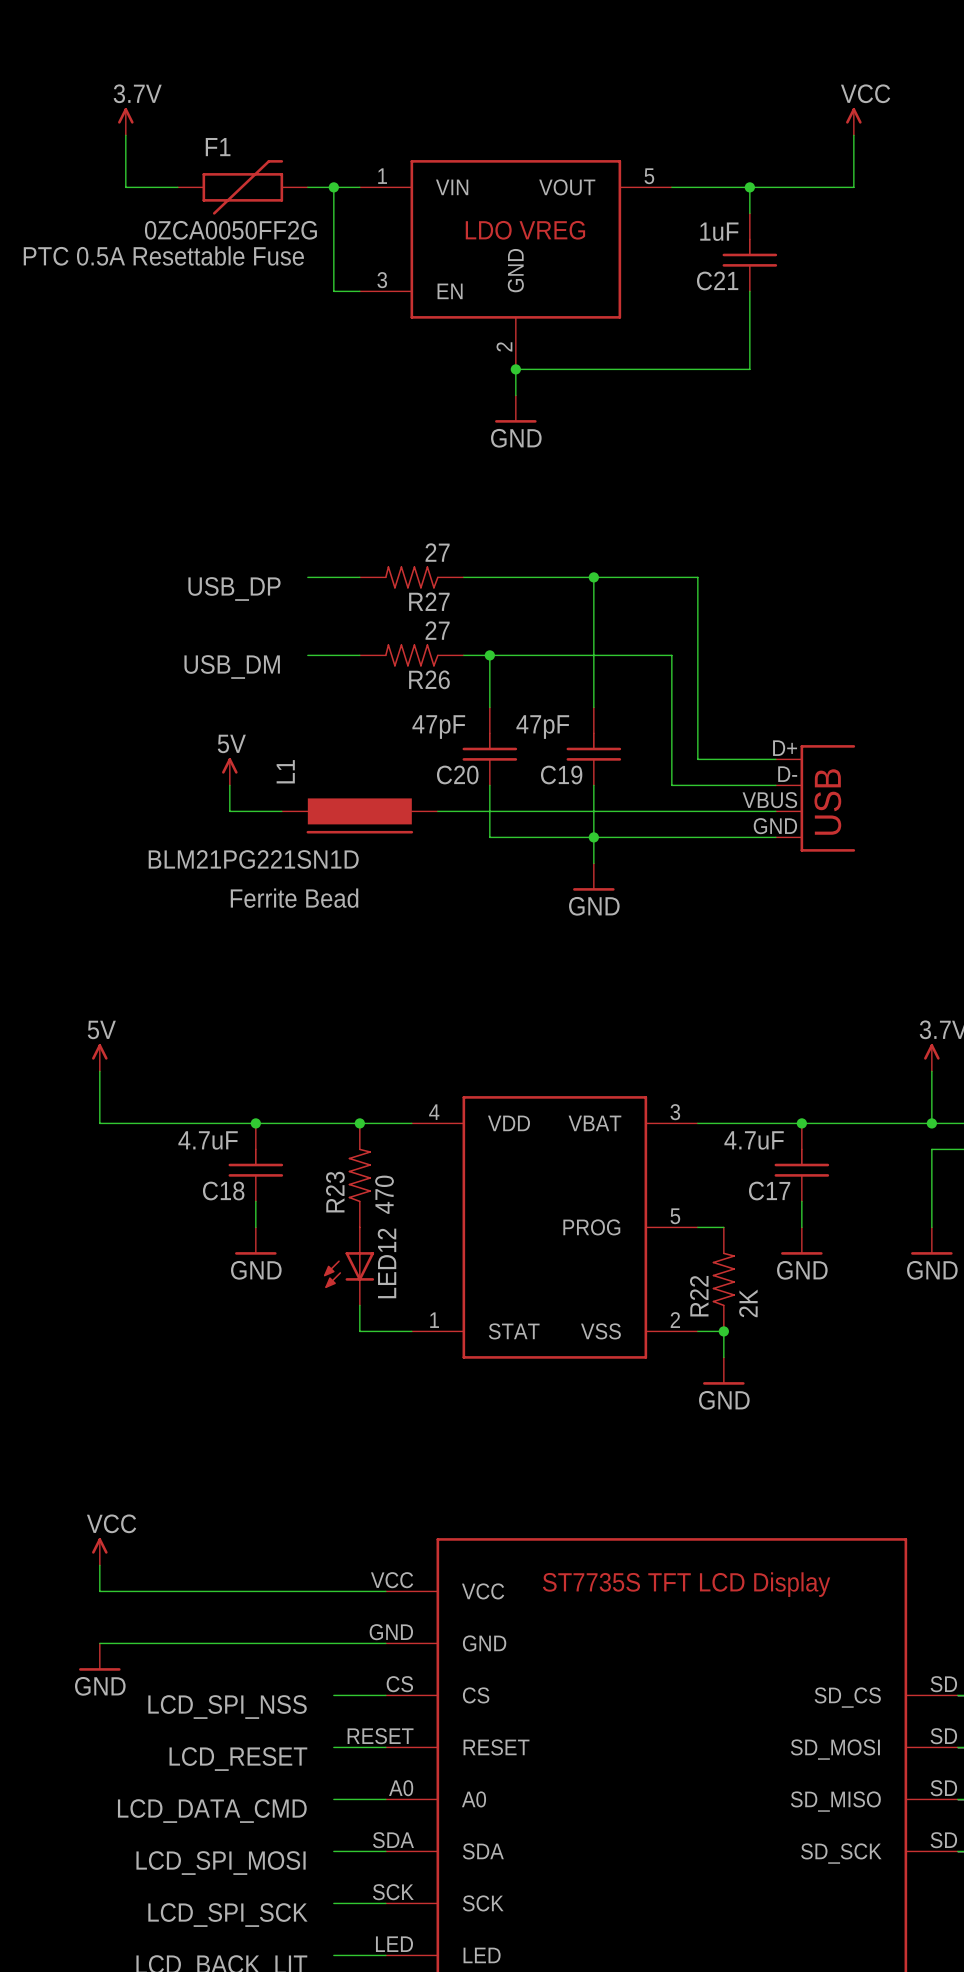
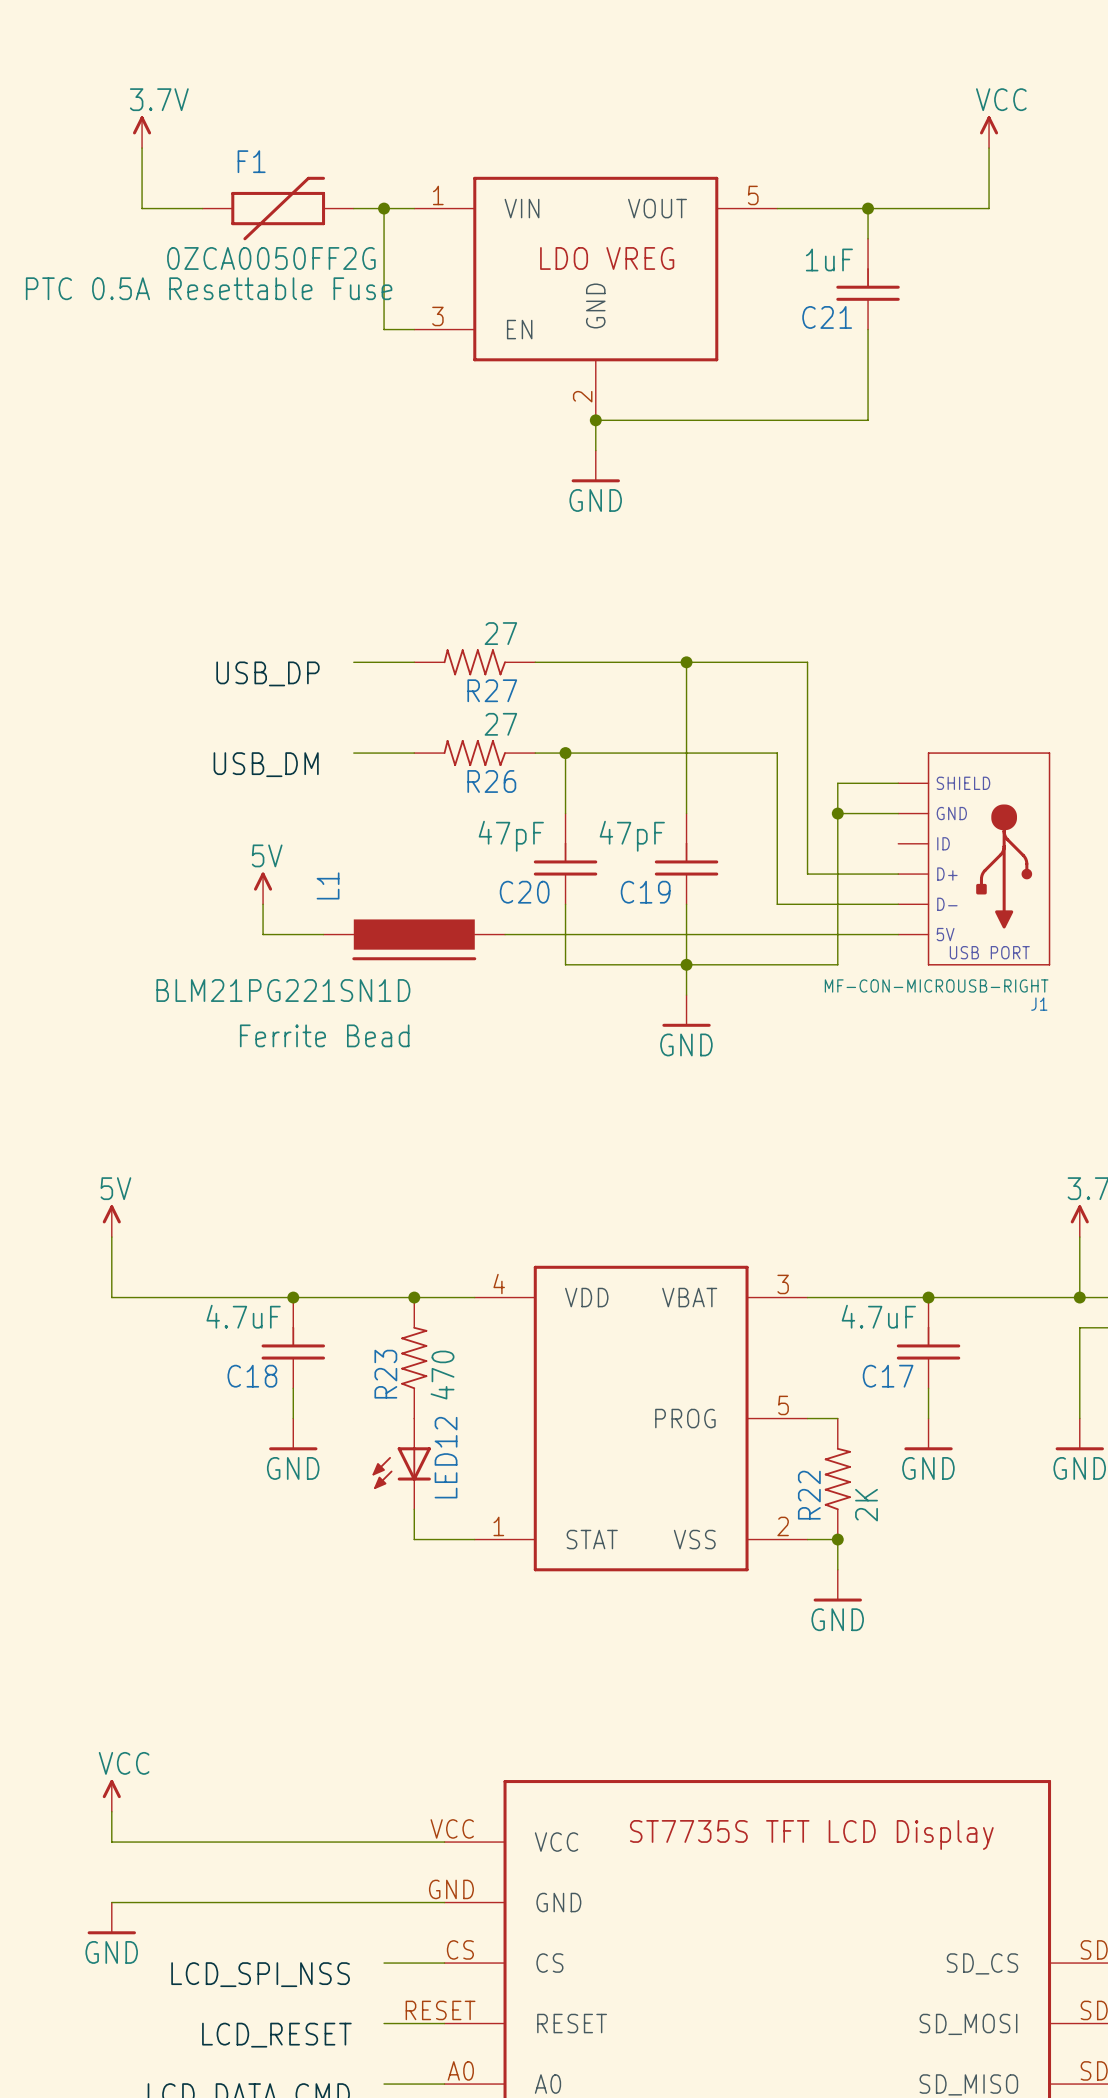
wire: none -> (837, 813) (898, 813)
junction: none -> (837, 813)
J1: none -> MF-CON-MICROUSB-RIGHT (974, 858)
part: (815, 798) -> none
wire: (723, 837) (775, 837) -> (837, 964) (837, 783) (898, 783)

